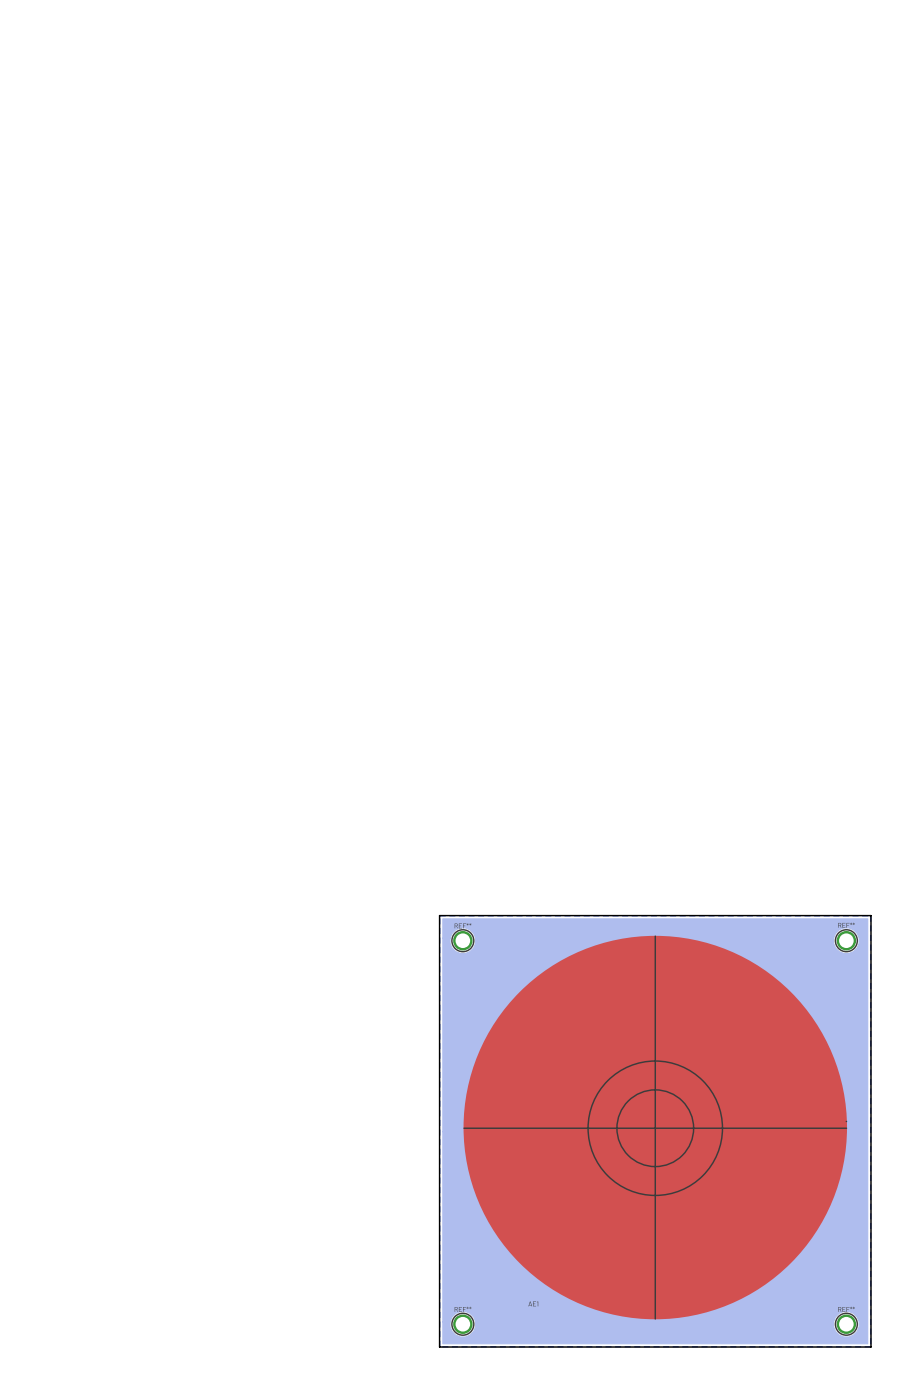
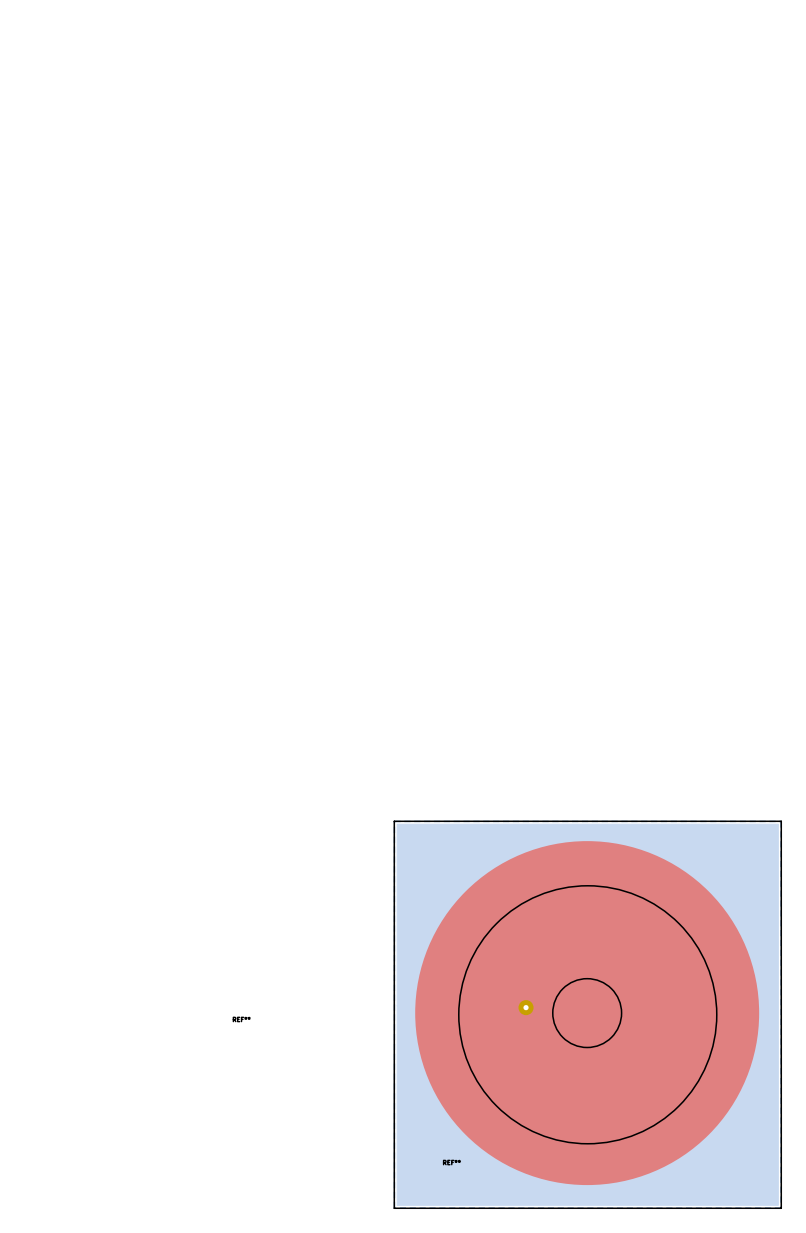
part: none -> (391, 604)
part: (462, 940) -> none
part: (846, 940) -> none
drawing: none -> [458, 885, 717, 1144]
part: none -> (526, 1007)
part: (655, 1127) -> none
part: (462, 1324) -> none
part: (846, 1324) -> none

